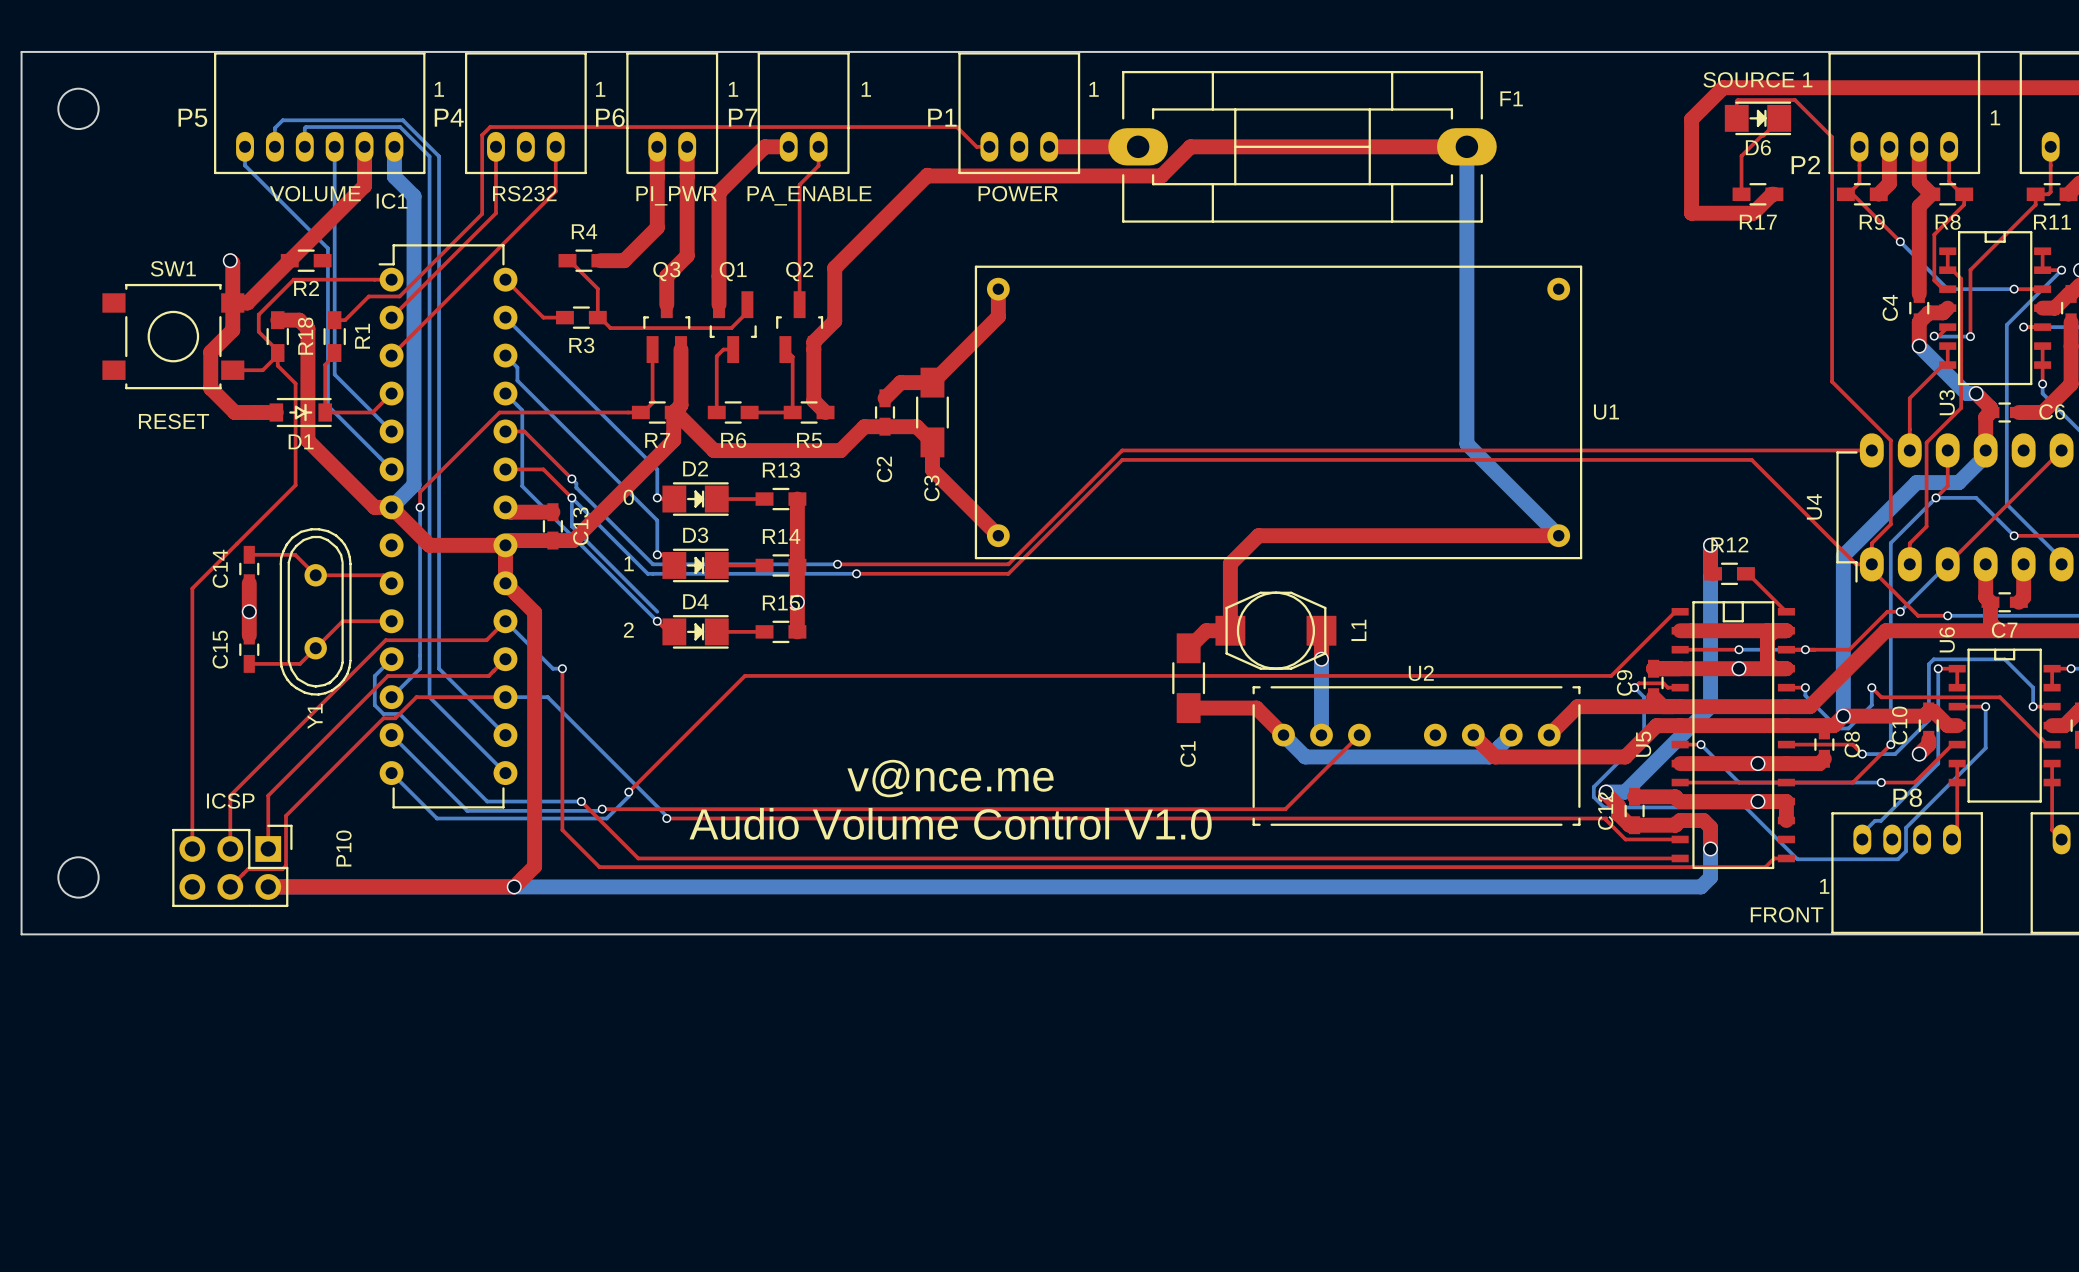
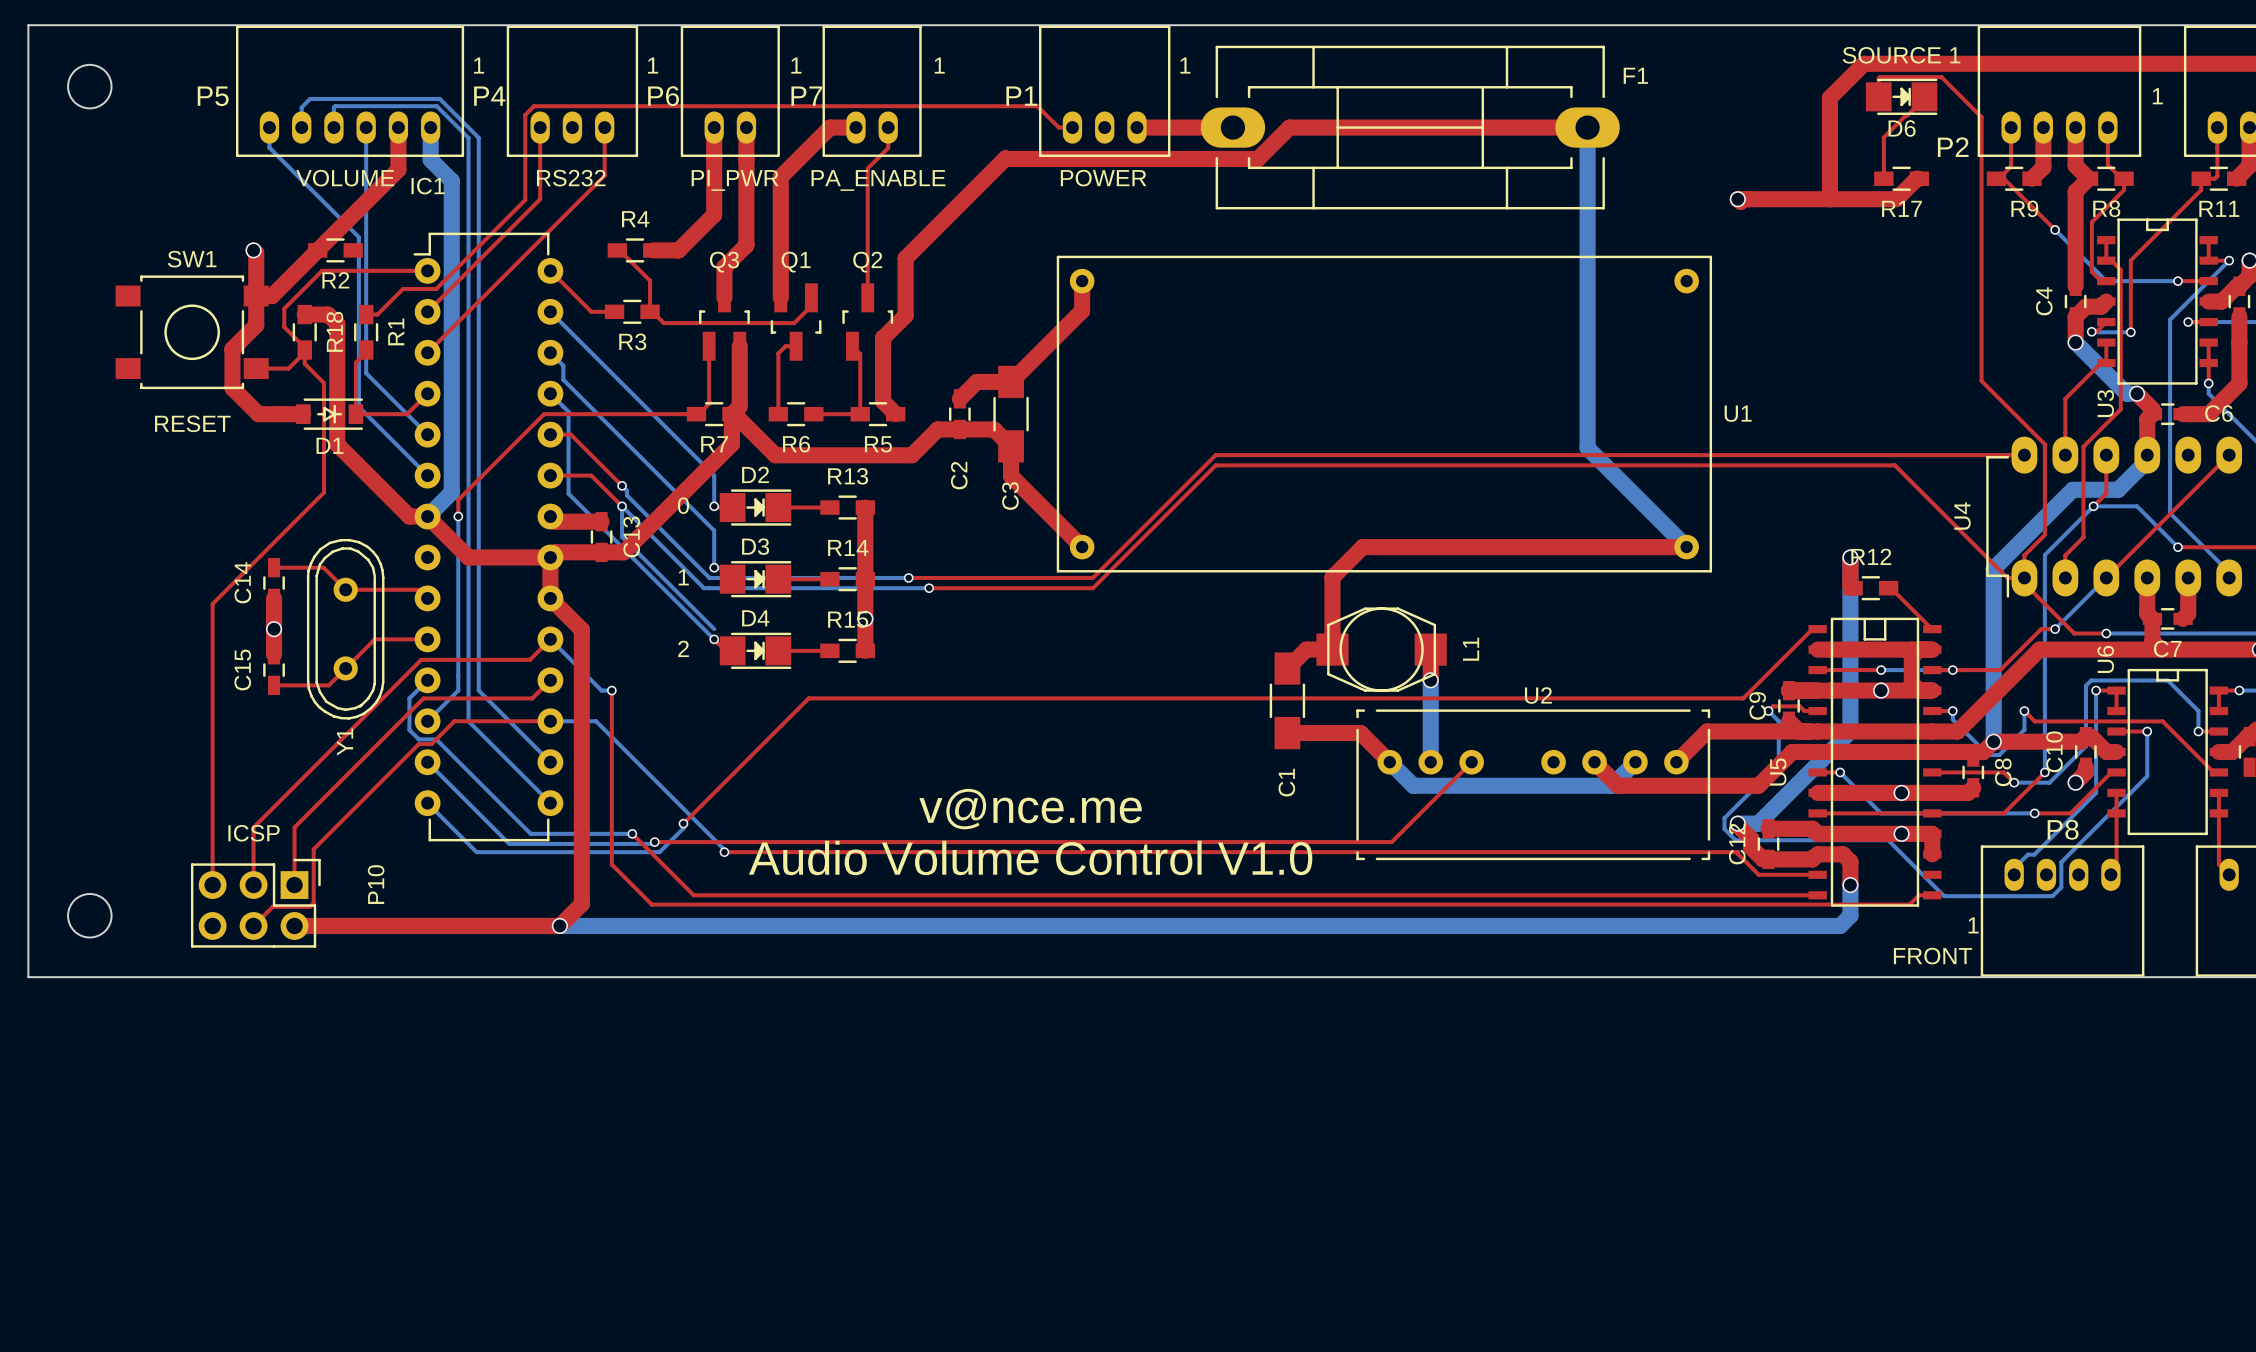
via: none -> (1737, 199)
top track: none -> (1829, 199) (1737, 199) (1740, 202)

